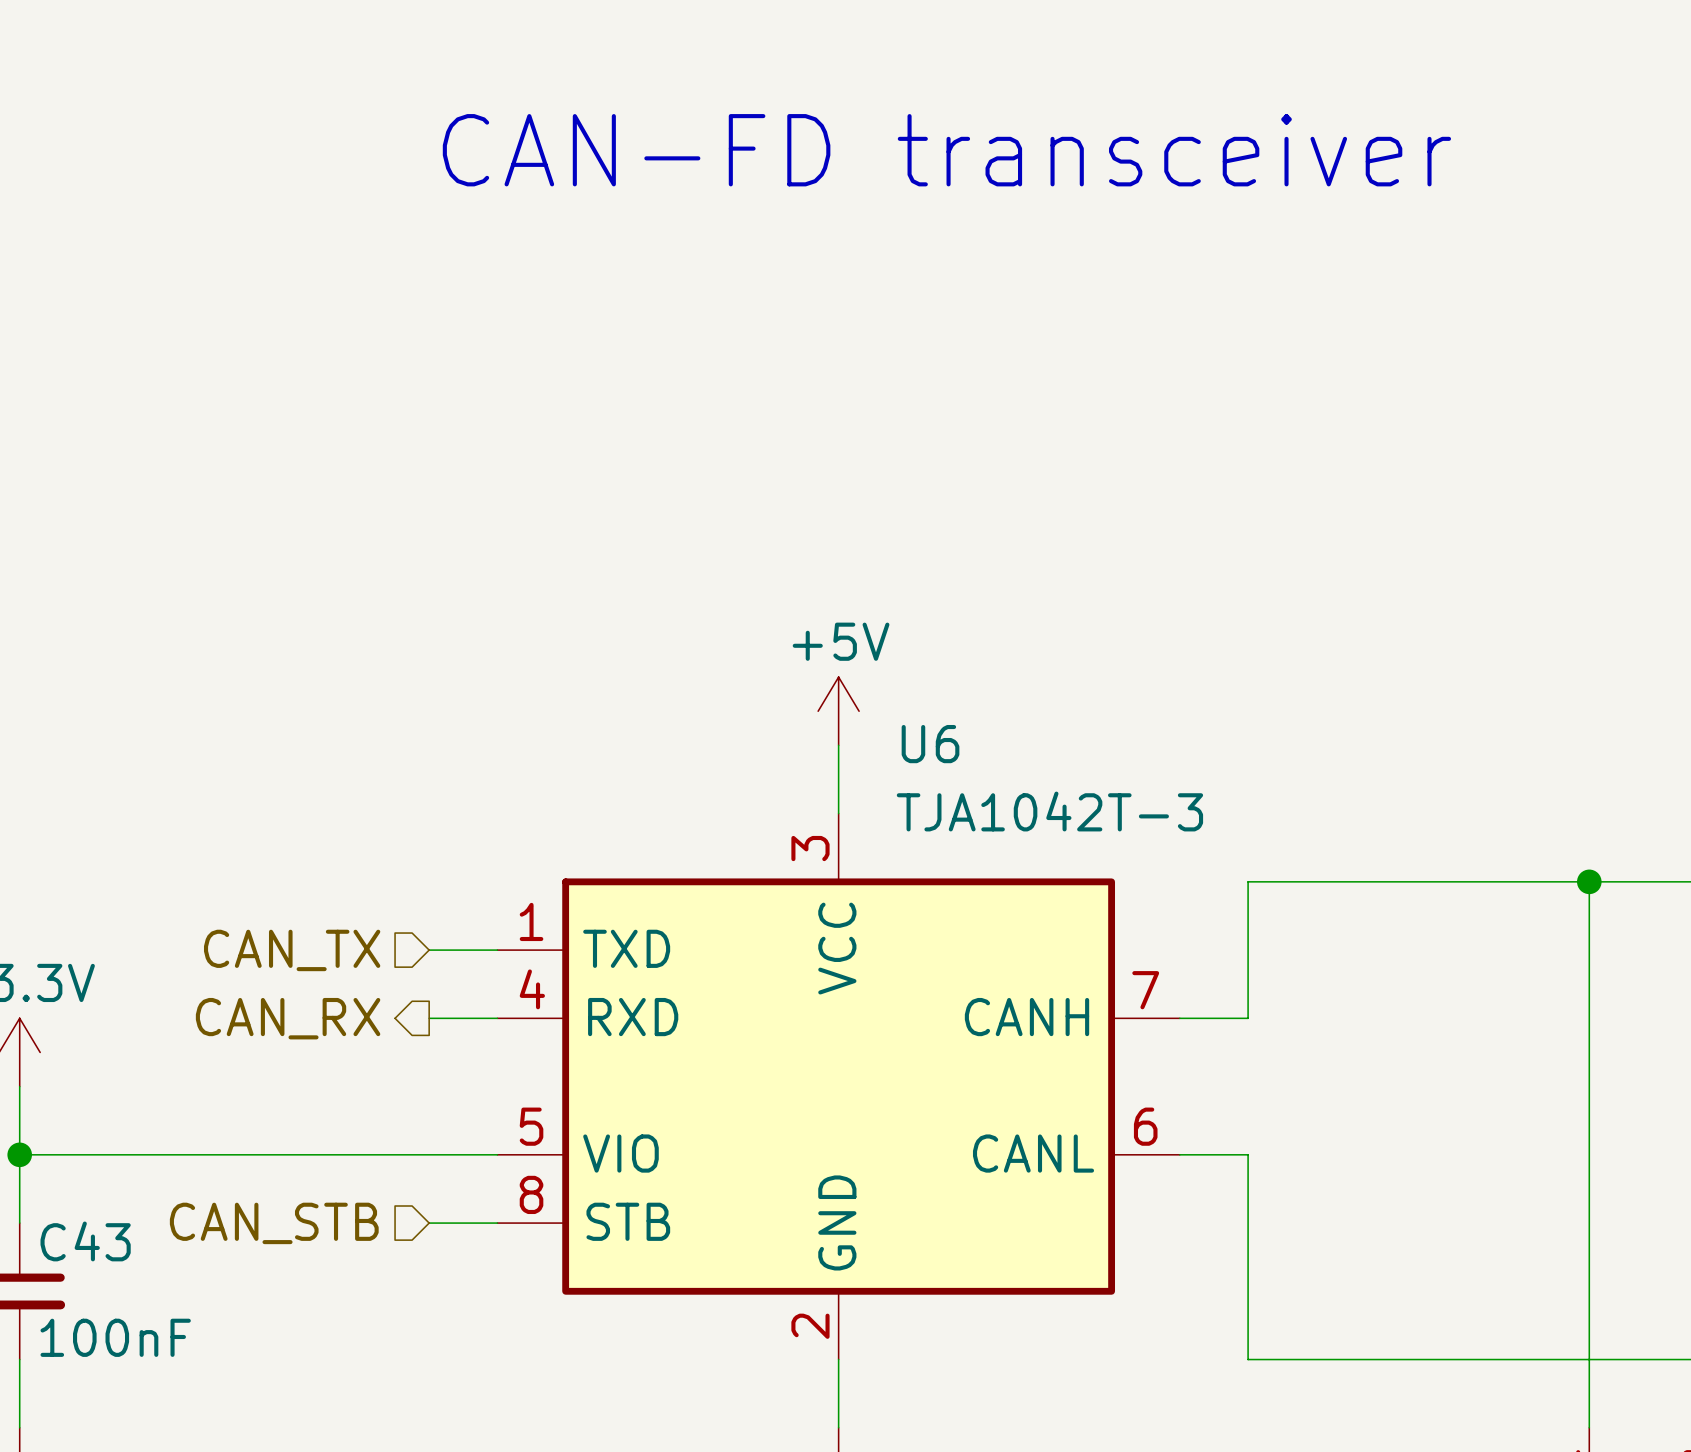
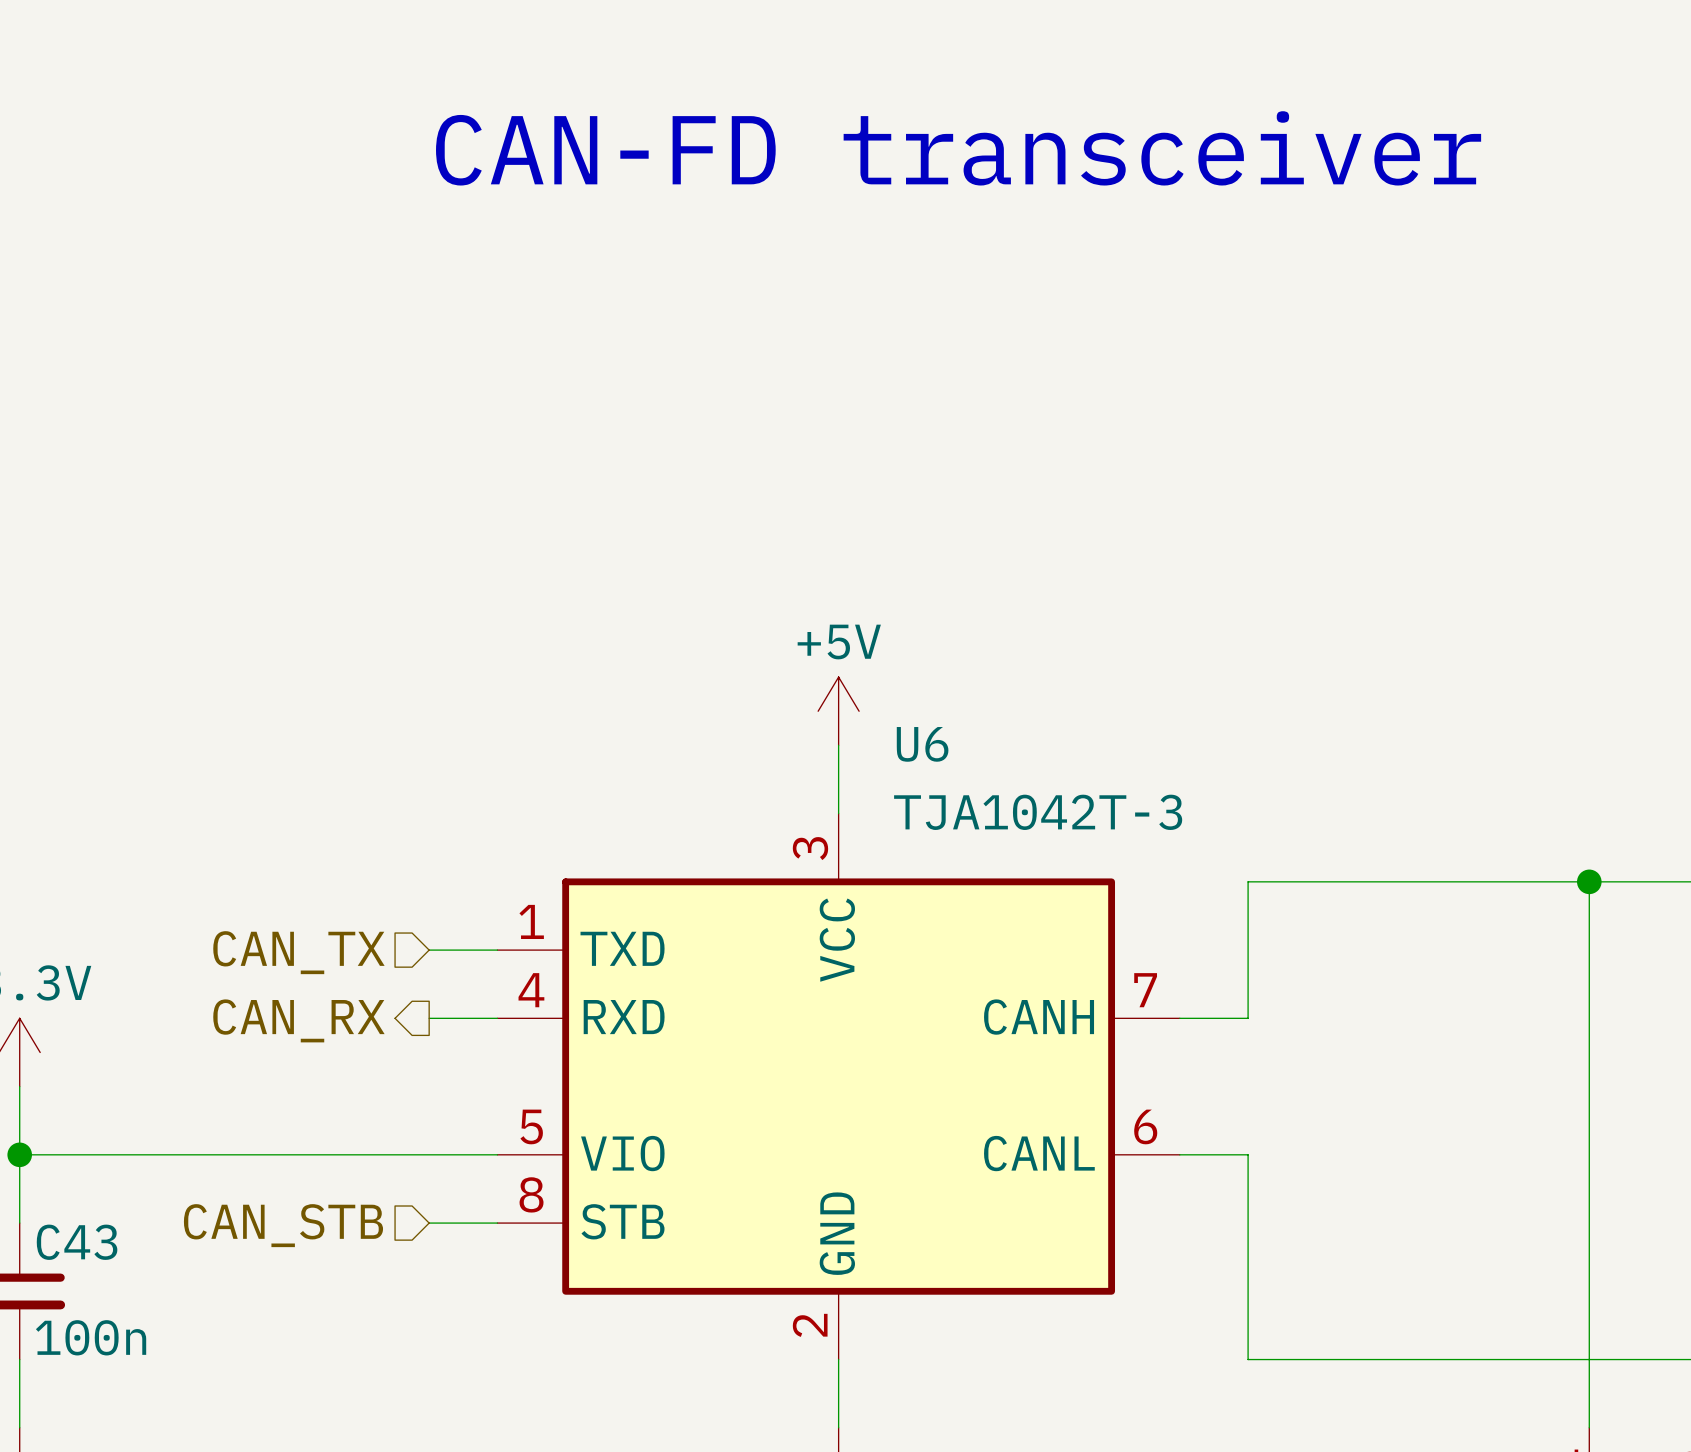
C43 value: 100nF (115, 1337) -> 100n (91, 1337)

